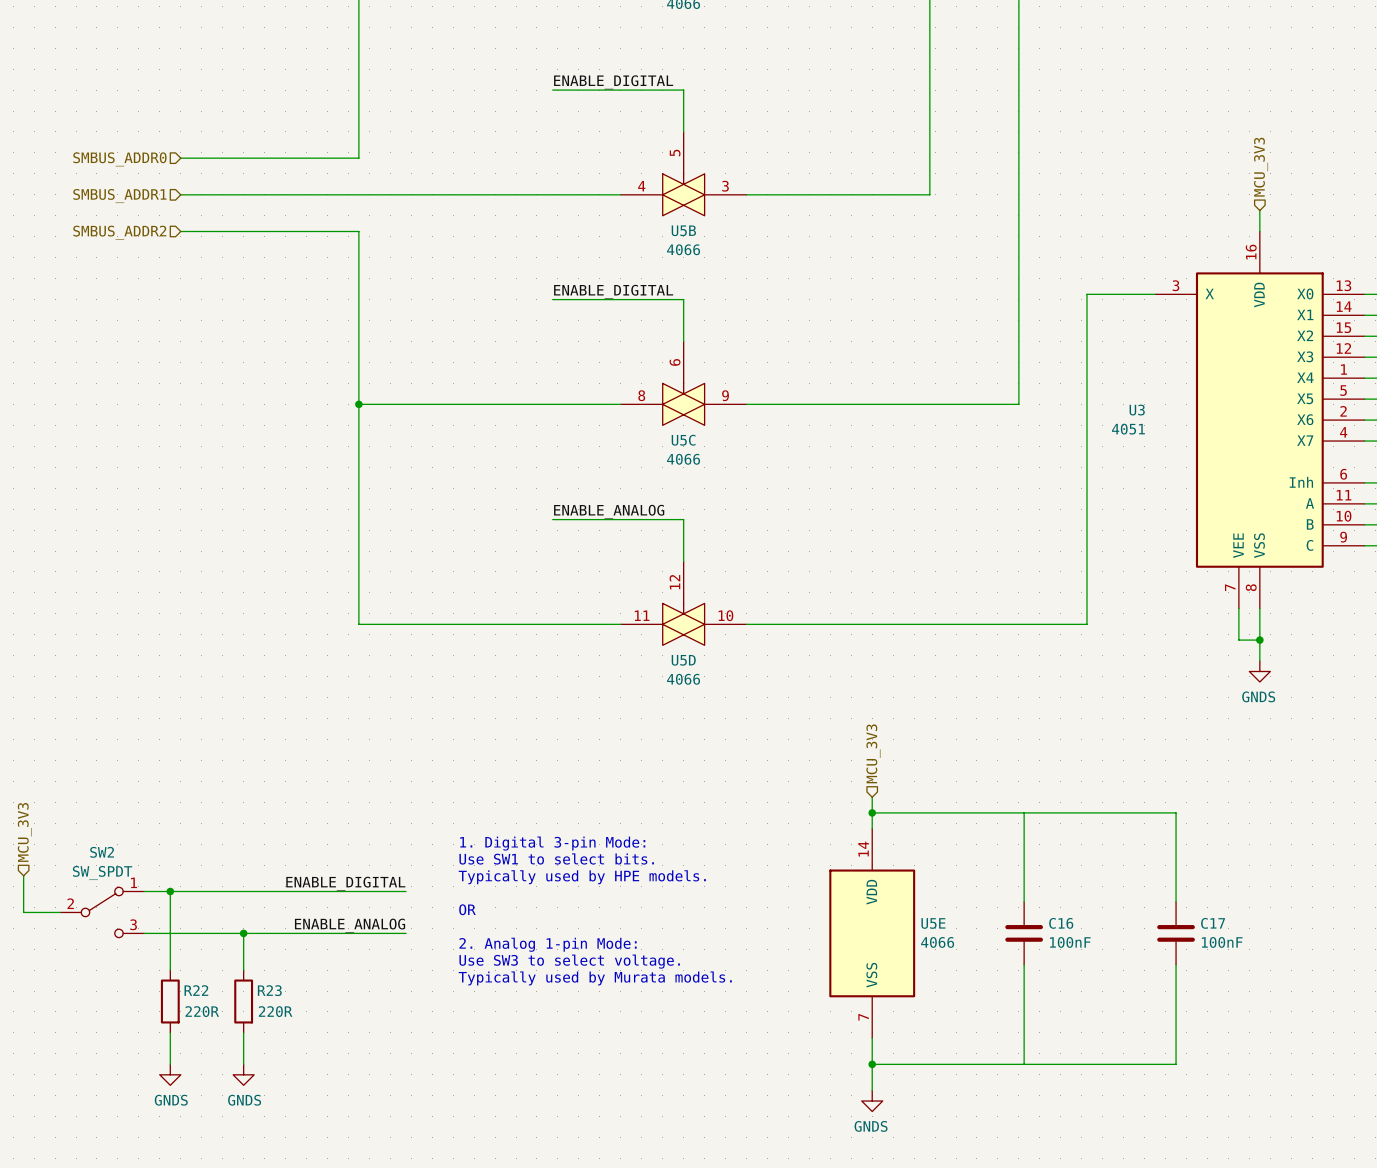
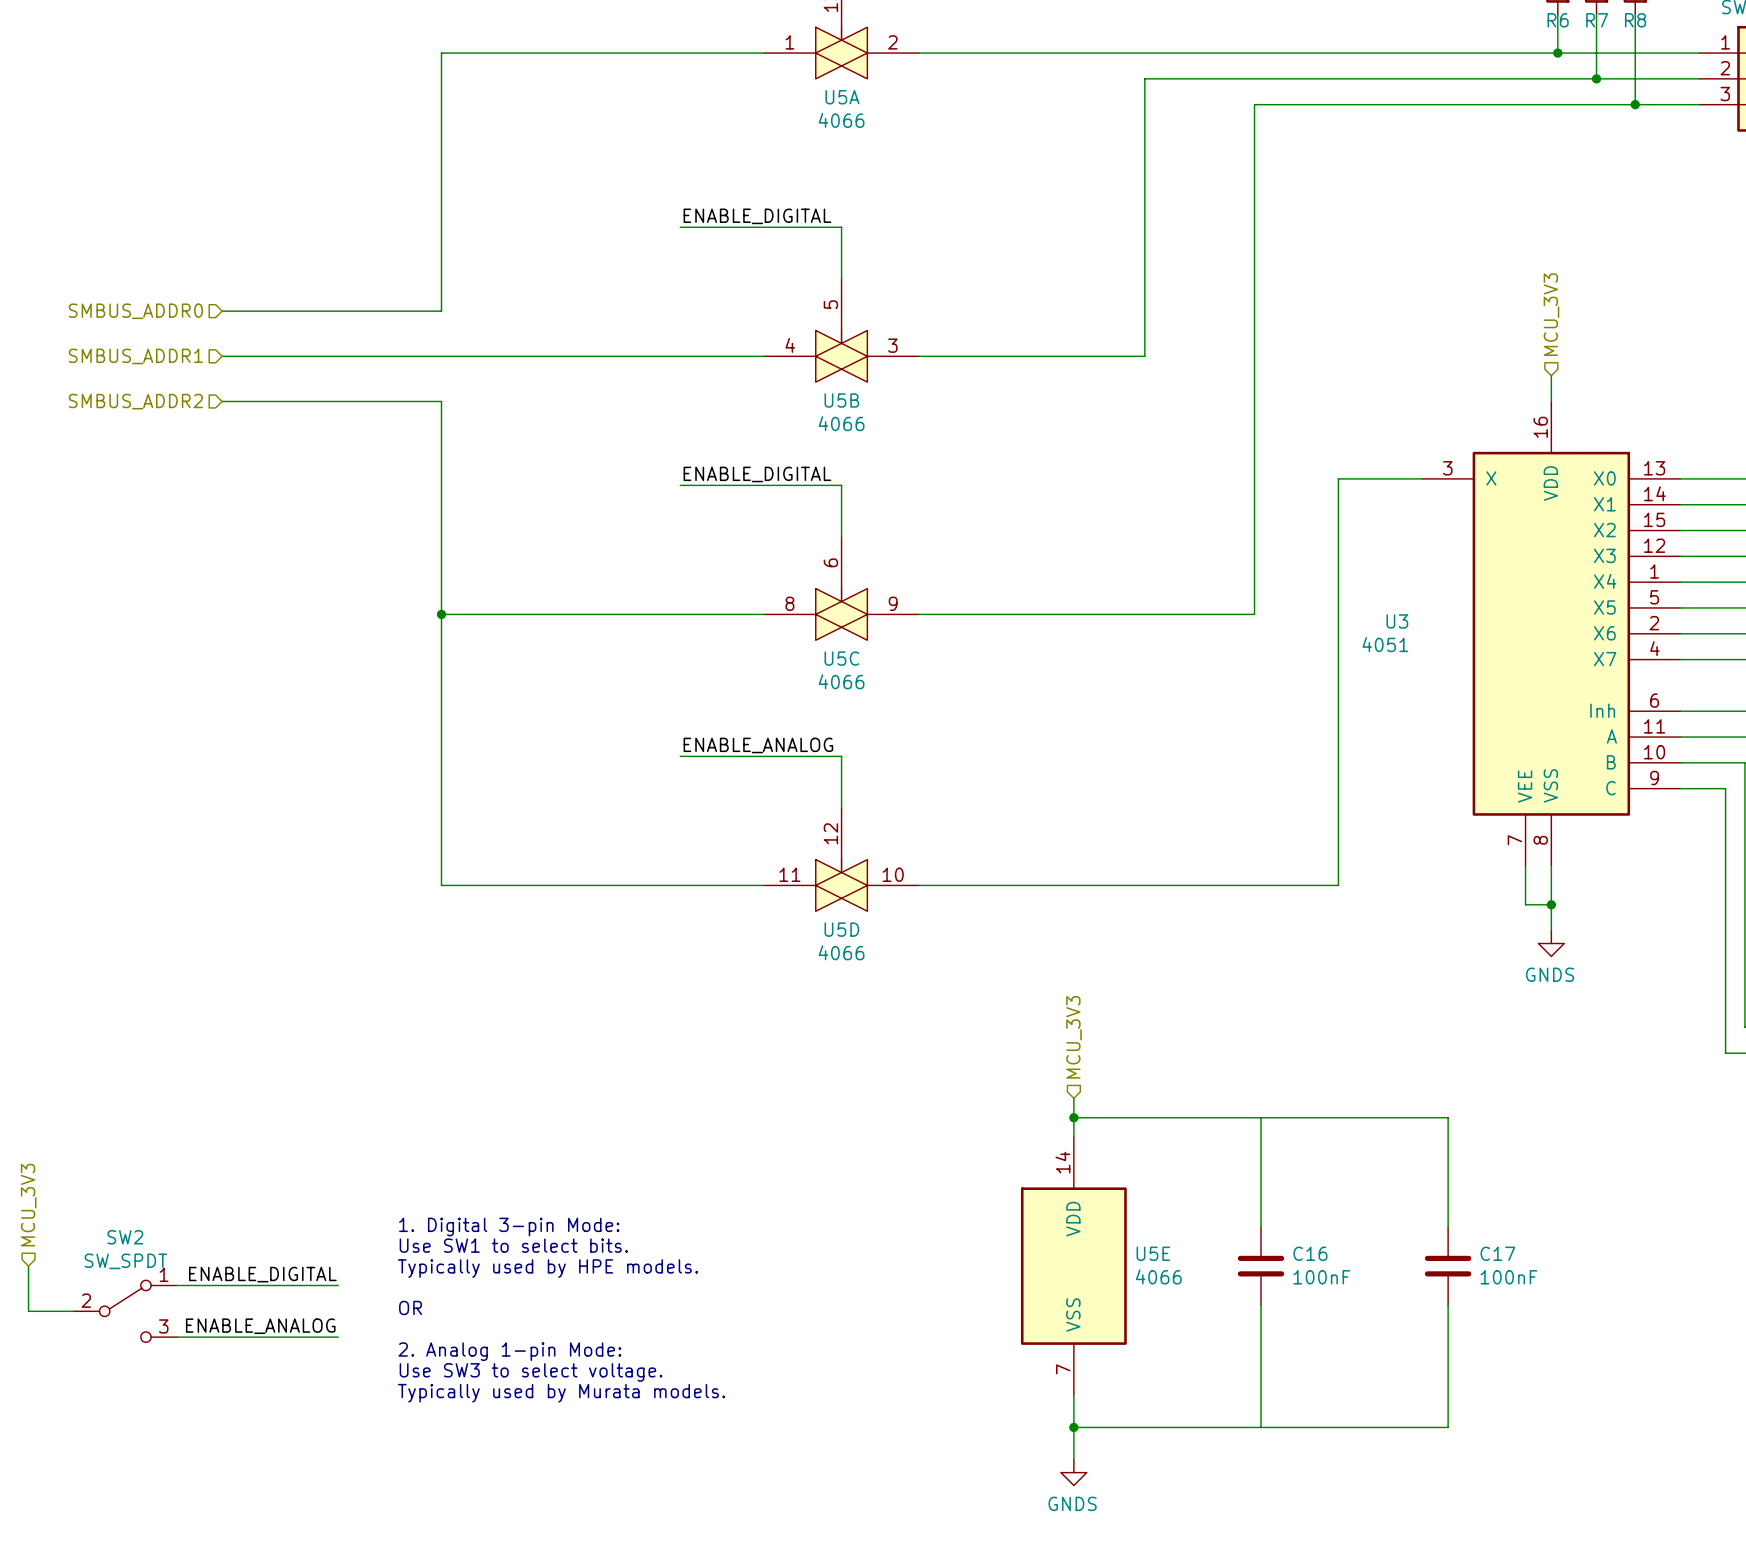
hierarchical label position: MCU_3V3 (24, 832) -> MCU_3V3 (28, 1205)
text position: 1. Digital 3-pin Mode: (552, 843) -> 1. Digital 3-pin Mode: (509, 1227)
text position: Use SW1 to select bits. (556, 858) -> Use SW1 to select bits. (513, 1245)
wire: (23, 875) (23, 912) (60, 912) -> (28, 1266) (28, 1311) (73, 1311)
text position: Typically used by HPE models. (582, 877) -> Typically used by HPE models. (547, 1268)
label position: ENABLE_DIGITAL (345, 883) -> ENABLE_DIGITAL (262, 1274)
wire: (144, 891) (406, 891) -> none
wire: (170, 891) (170, 970) -> none
junction: (170, 891) -> none
text position: OR (467, 909) -> OR (410, 1307)
SW2 position: (102, 912) -> (125, 1311)
label position: ENABLE_ANALOG (350, 925) -> ENABLE_ANALOG (260, 1326)
wire: (144, 933) (406, 933) -> none
wire: (243, 933) (243, 970) -> none
junction: (243, 933) -> none
text position: 2. Analog 1-pin Mode: (548, 944) -> 2. Analog 1-pin Mode: (509, 1351)
wire: none -> (176, 1285) (338, 1285)
text position: Use SW3 to select voltage. (569, 961) -> Use SW3 to select voltage. (531, 1372)
text position: Typically used by Murata models. (595, 978) -> Typically used by Murata models. (561, 1393)
wire: none -> (176, 1337) (338, 1337)
R22: 220R (170, 1001) -> none
R23: 220R (243, 1001) -> none
wire: (170, 1032) (170, 1064) -> none
wire: (243, 1032) (243, 1064) -> none
power symbol: GNDS (170, 1074) -> none
power symbol: GNDS (243, 1074) -> none

